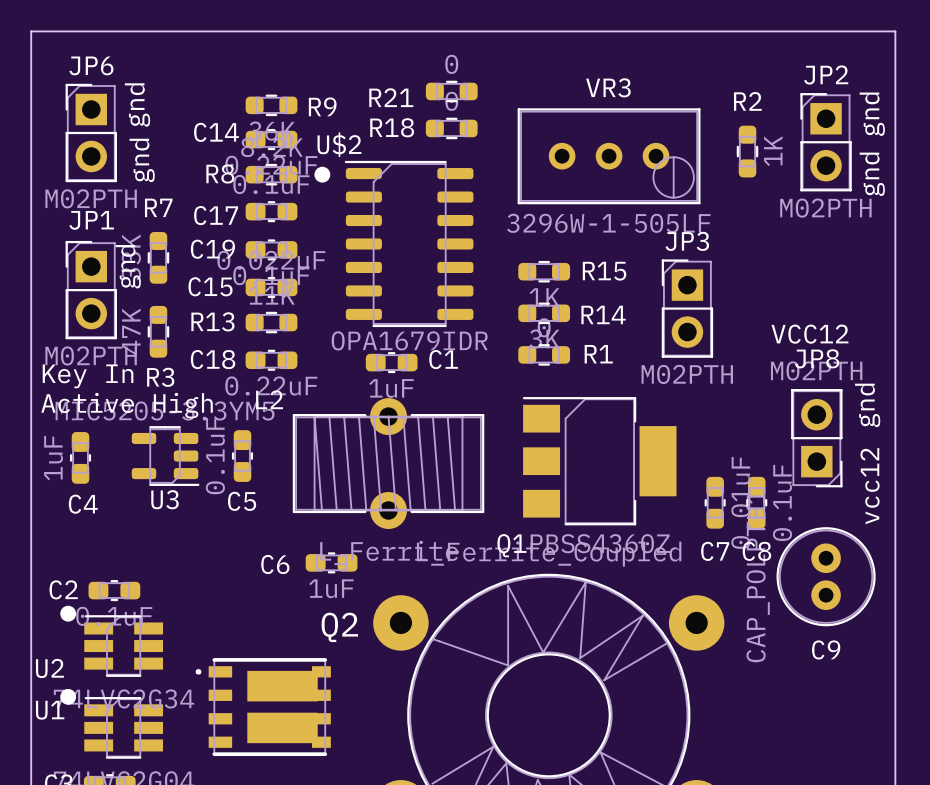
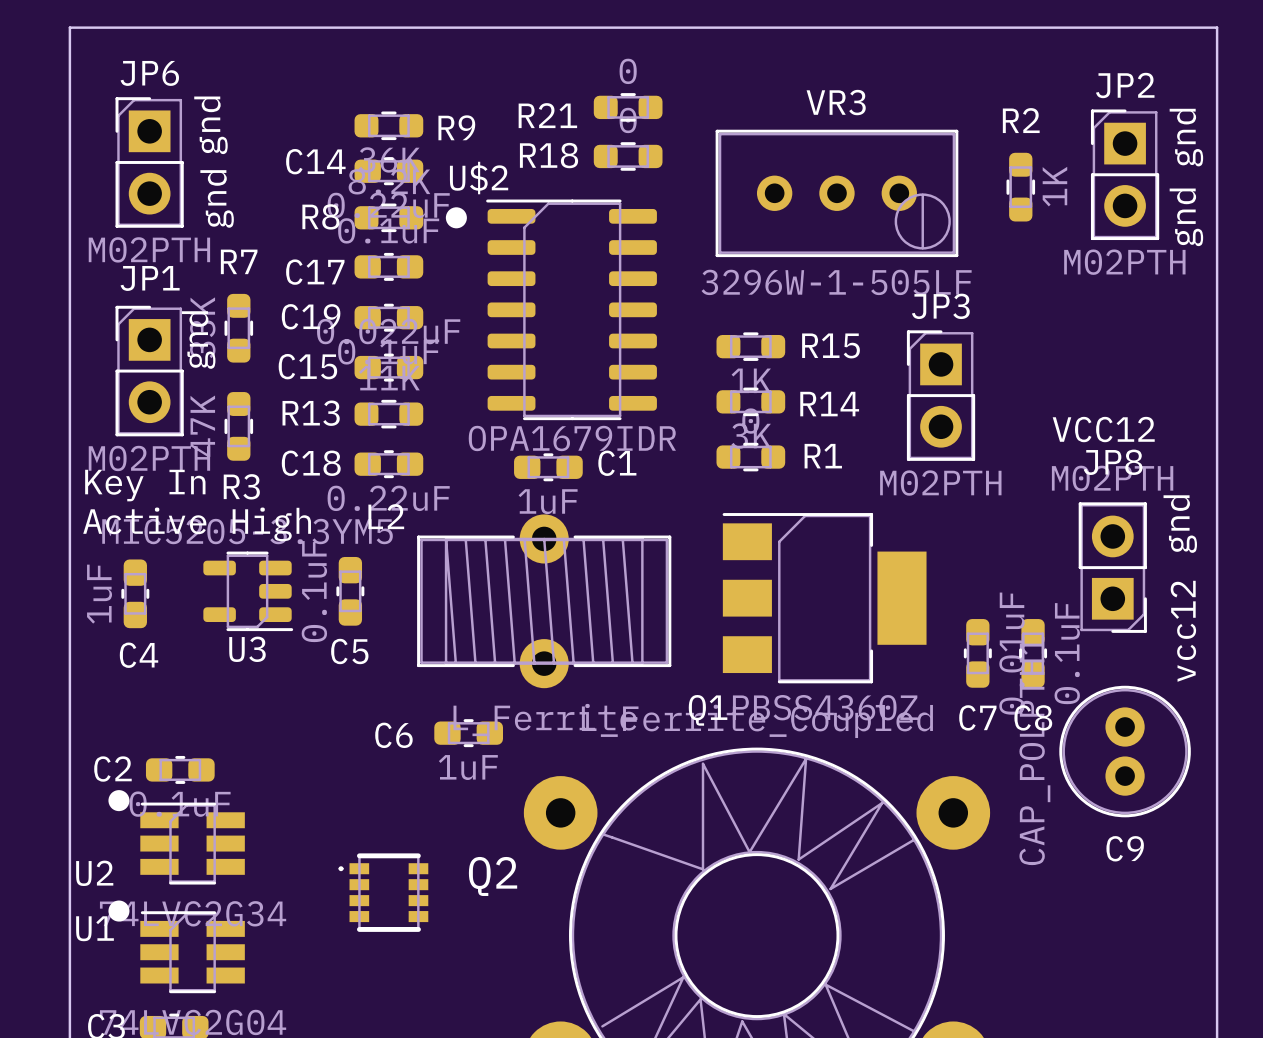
Q2 name position: Q2 (339, 627) -> Q2 (493, 876)
Q2 footprint: [195, 658, 331, 757] -> [338, 853, 429, 932]

